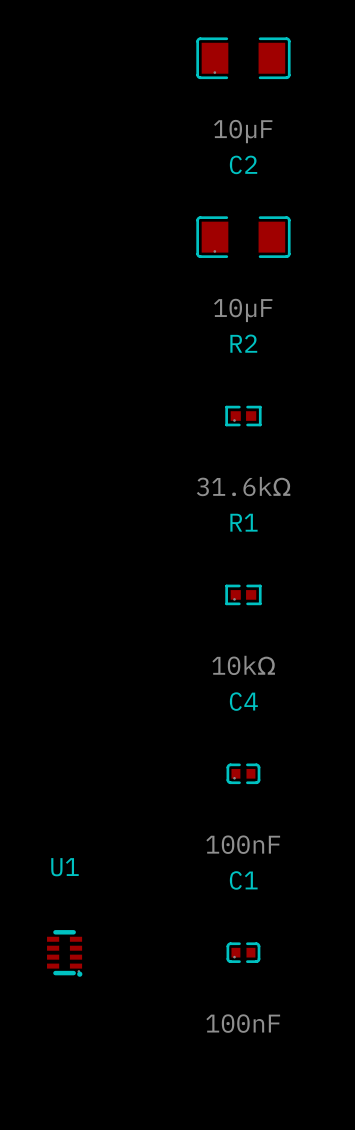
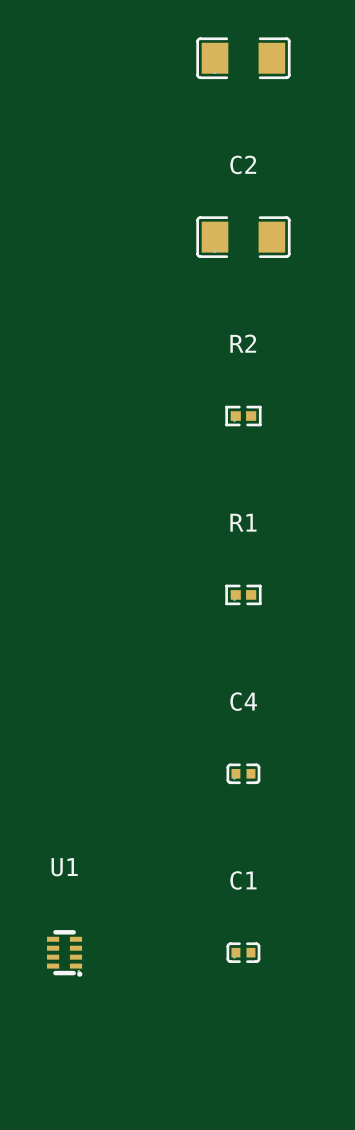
part value: 10µF (243, 131) -> none
C2 value: 10µF (243, 310) -> none
R2 value: 31.6kΩ (243, 486) -> none
R1 value: 10kΩ (243, 665) -> none
C4 value: 100nF (243, 844) -> none
C1 value: 100nF (243, 1023) -> none

